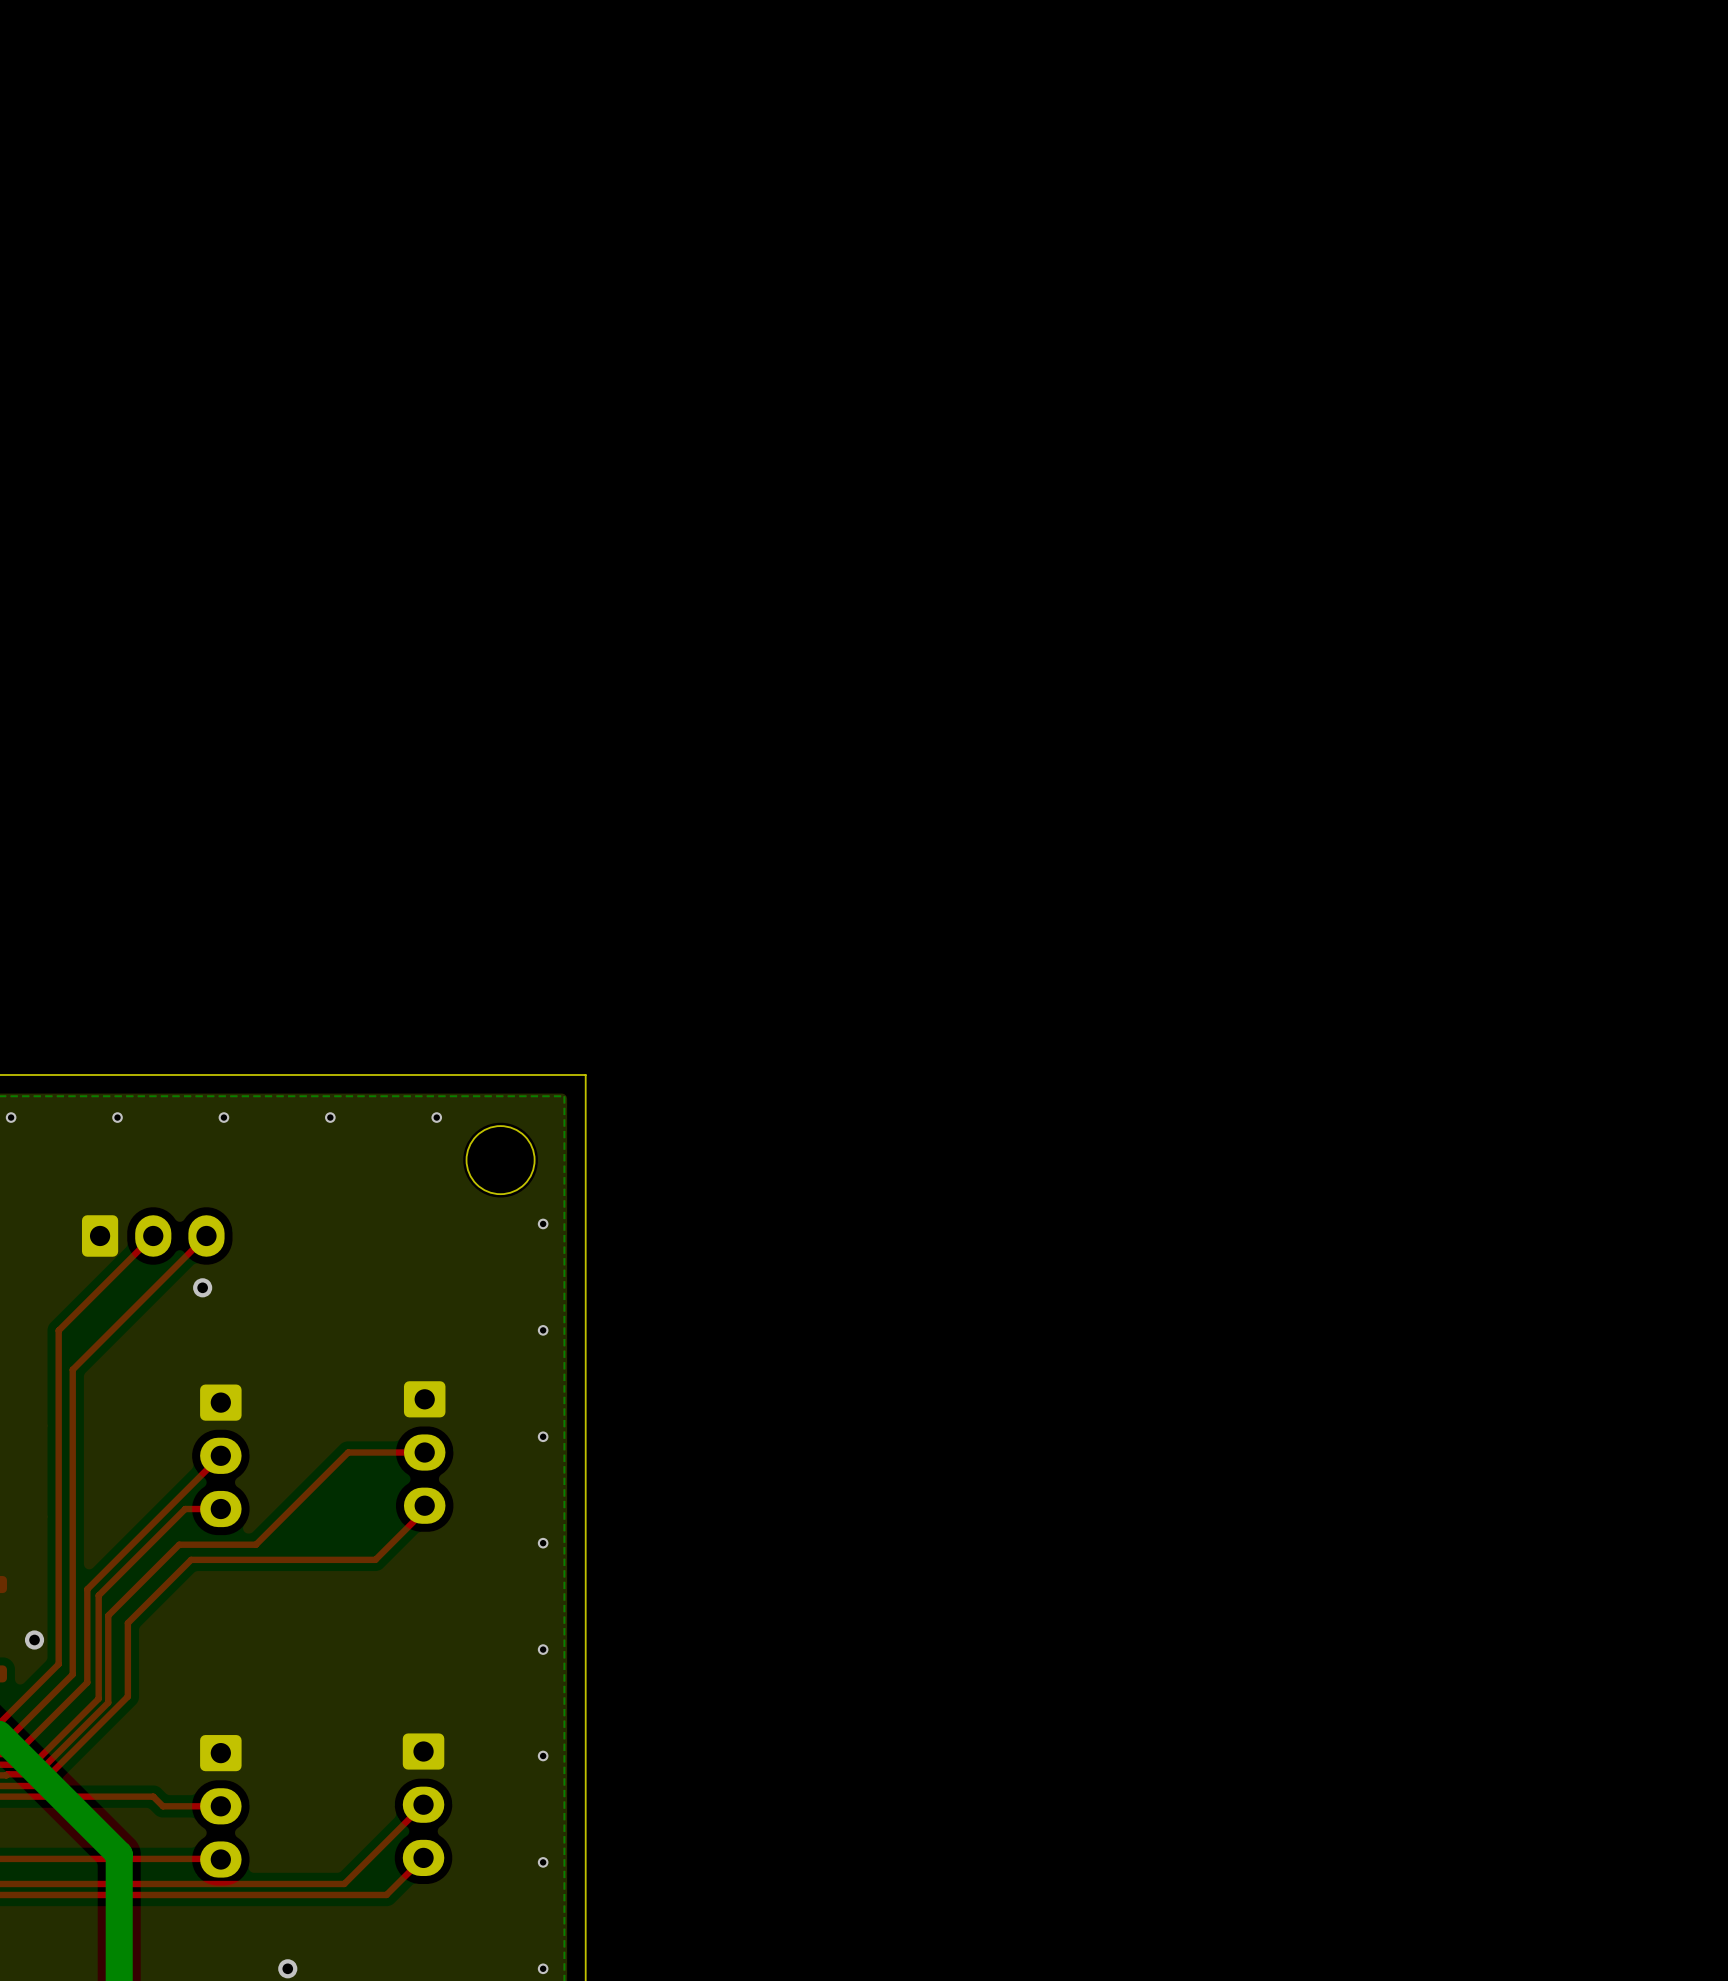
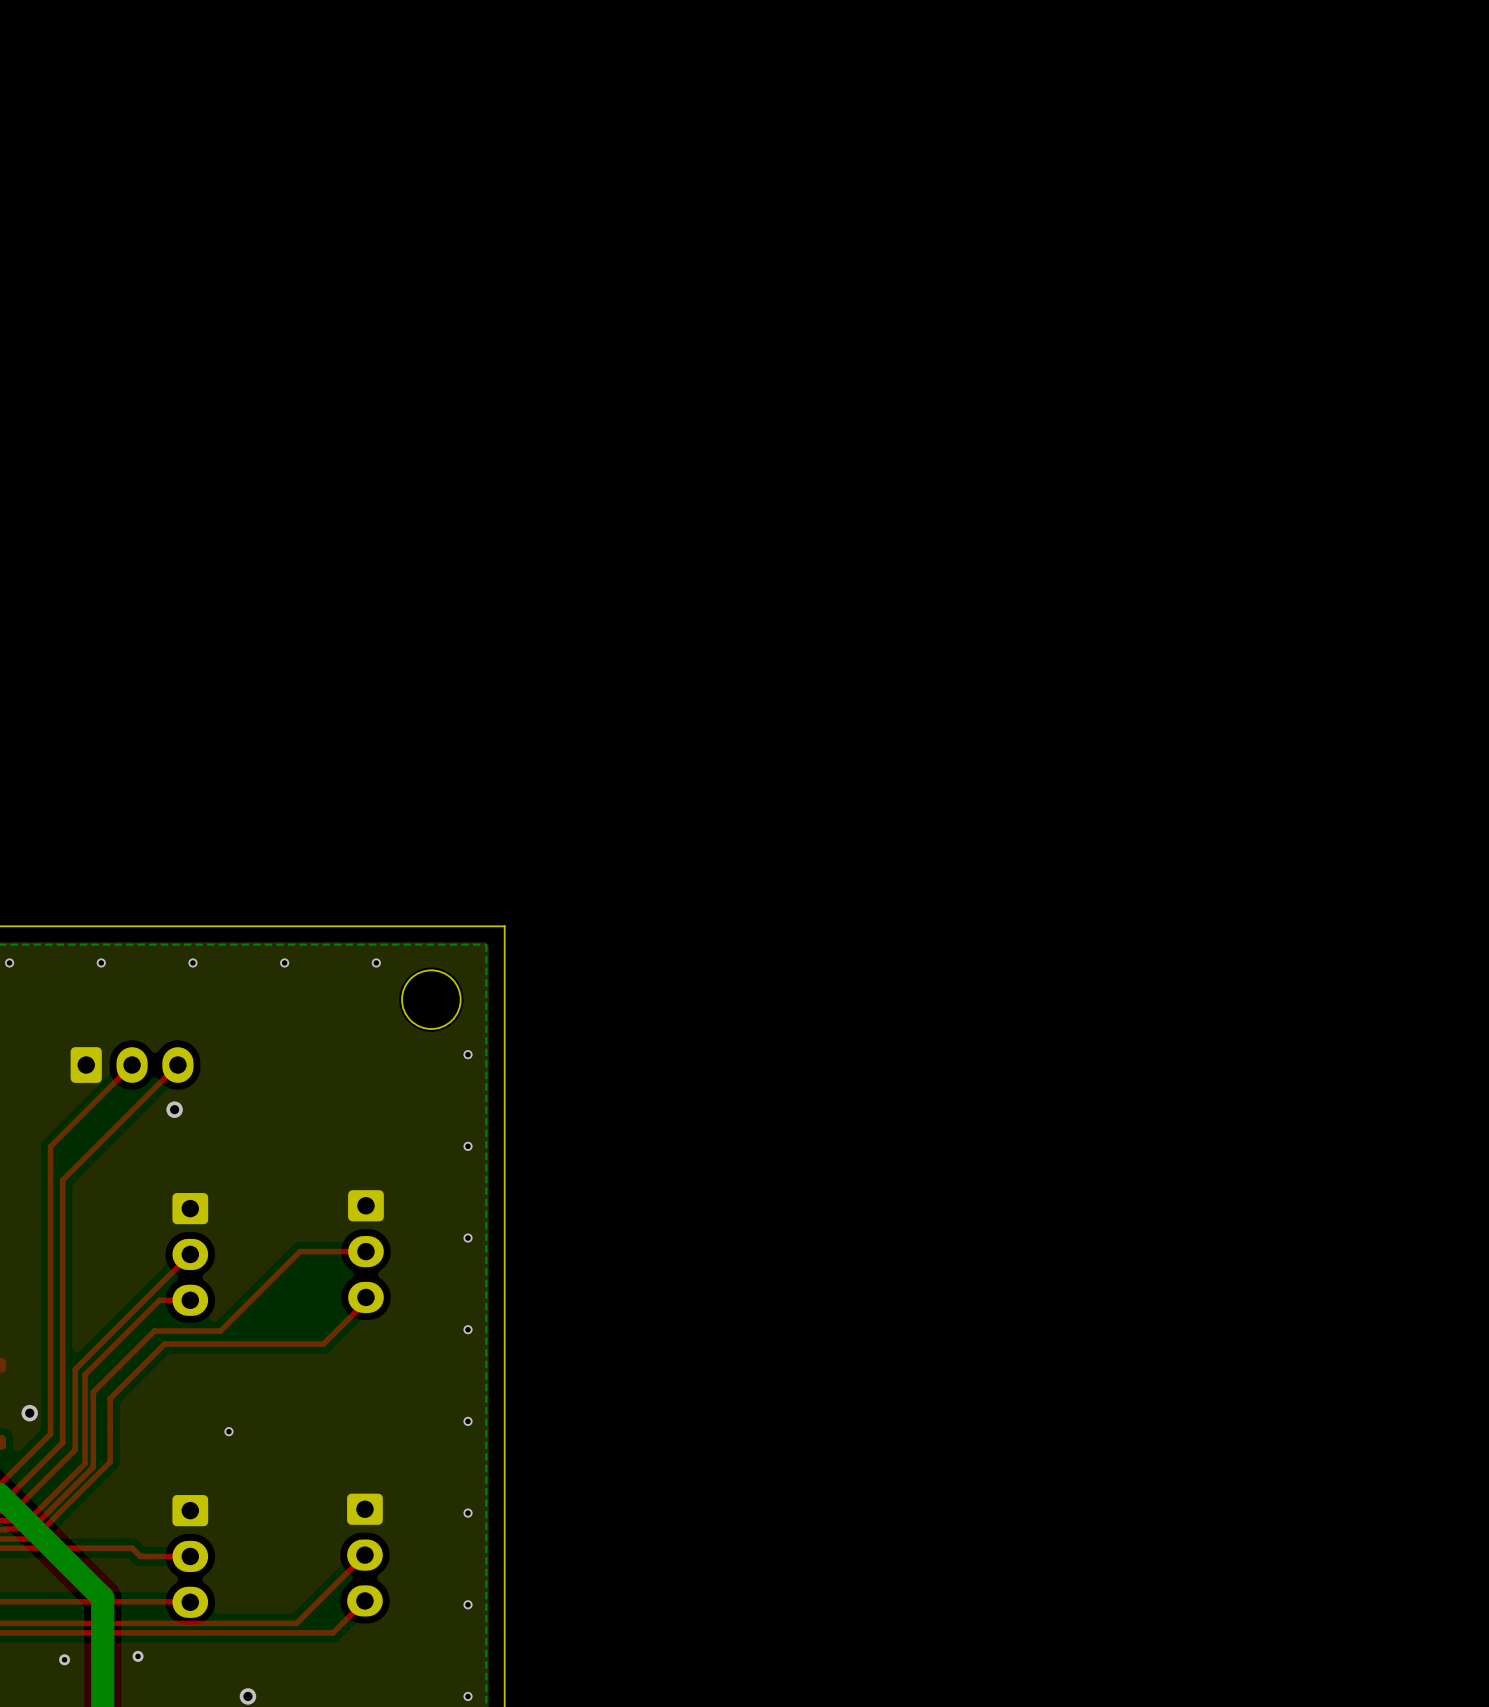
via: none -> (228, 1431)
via: none -> (138, 1656)
via: none -> (64, 1659)

